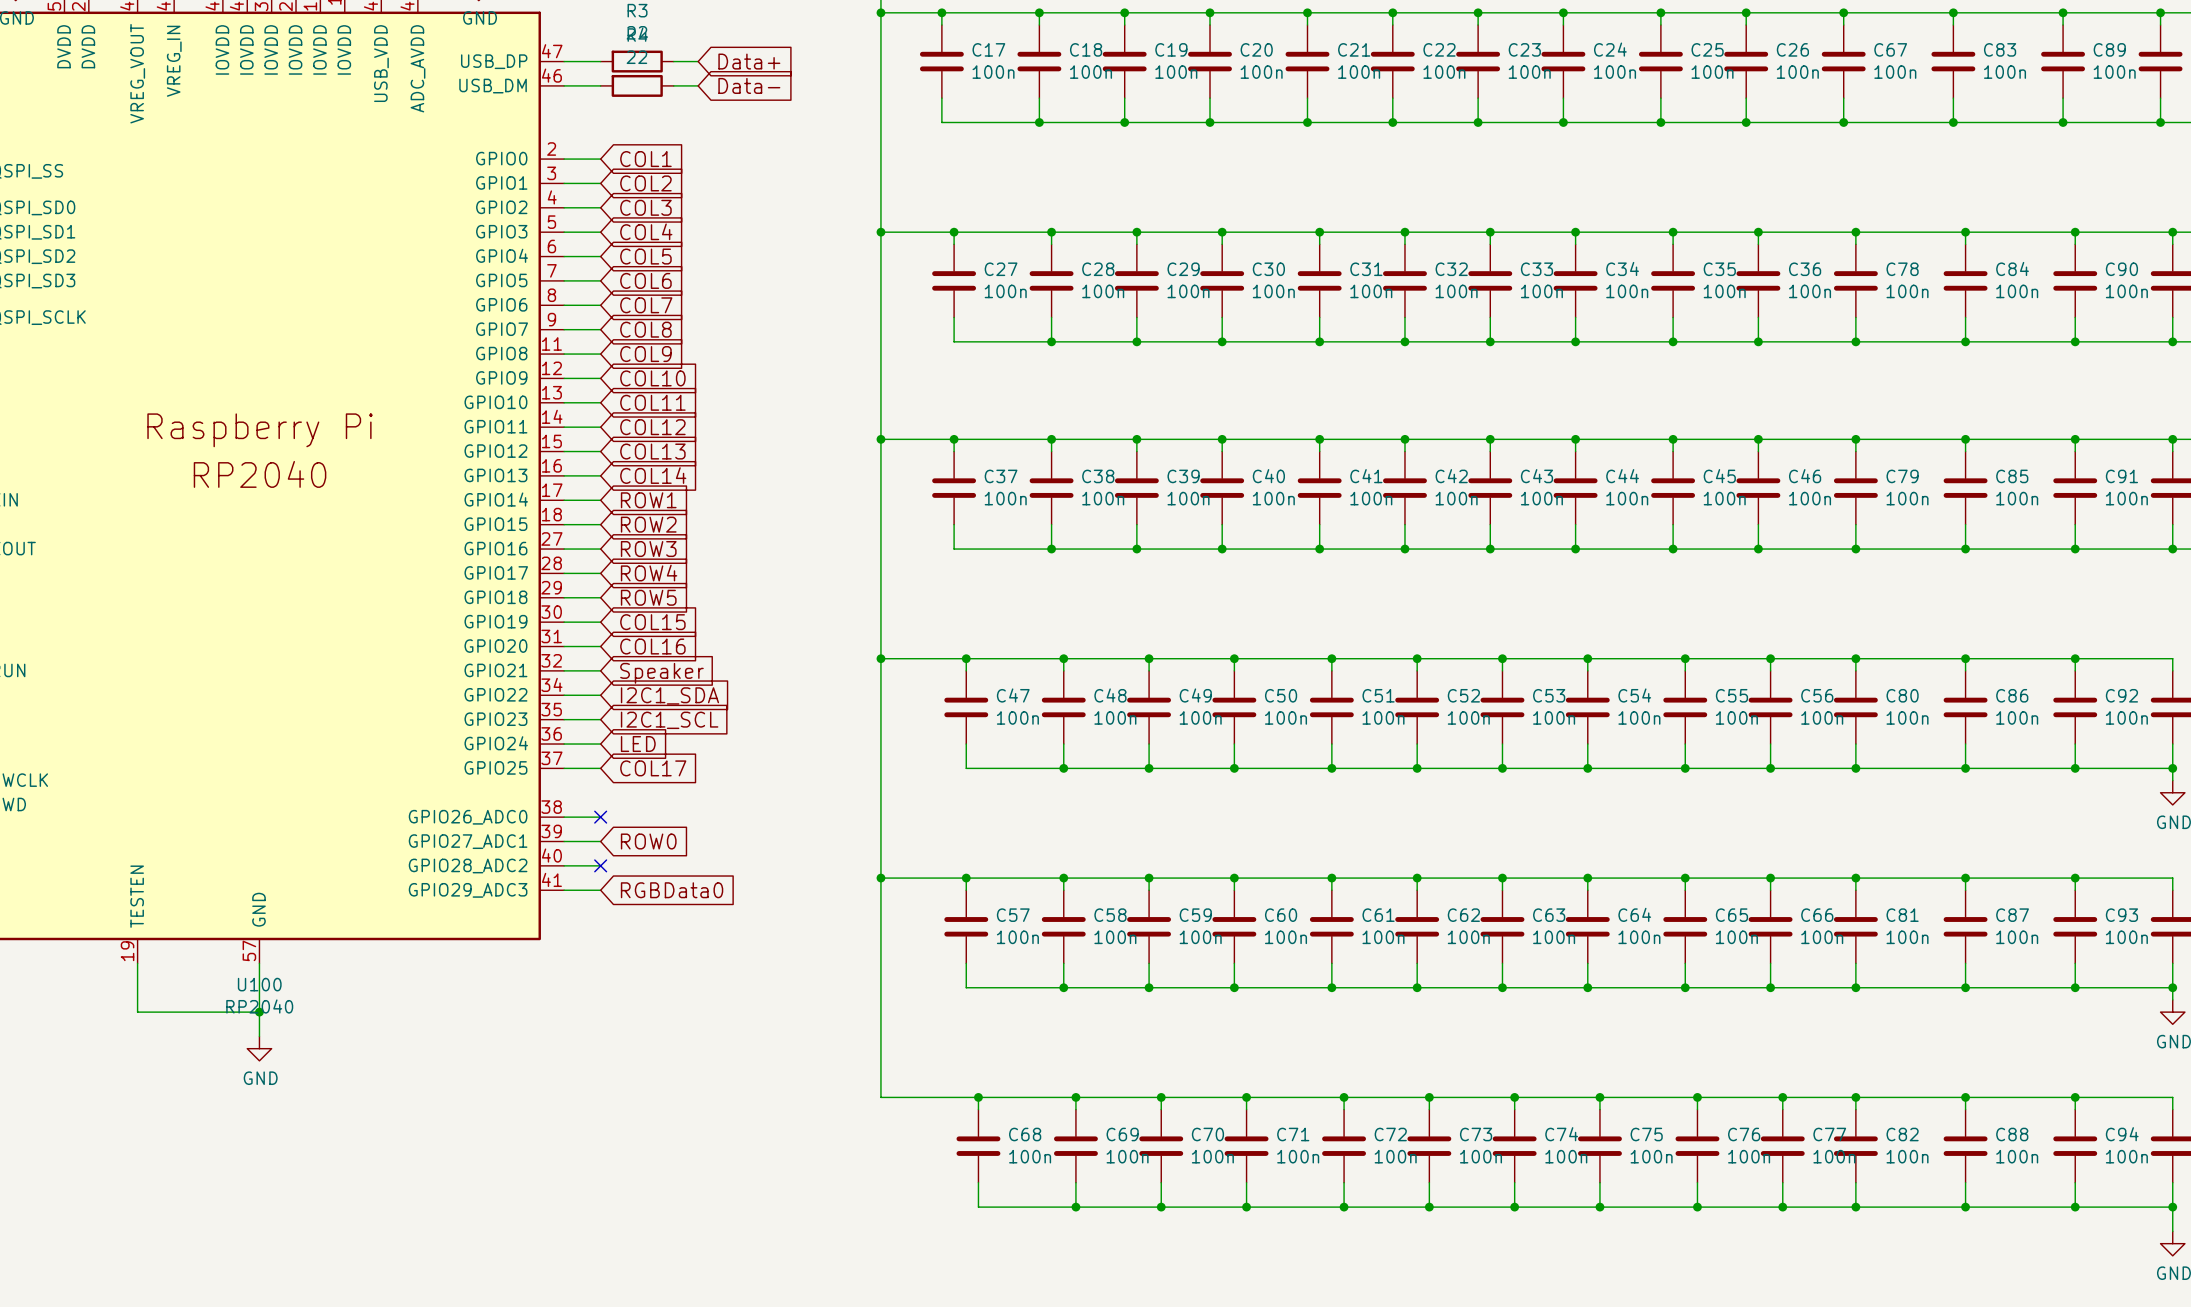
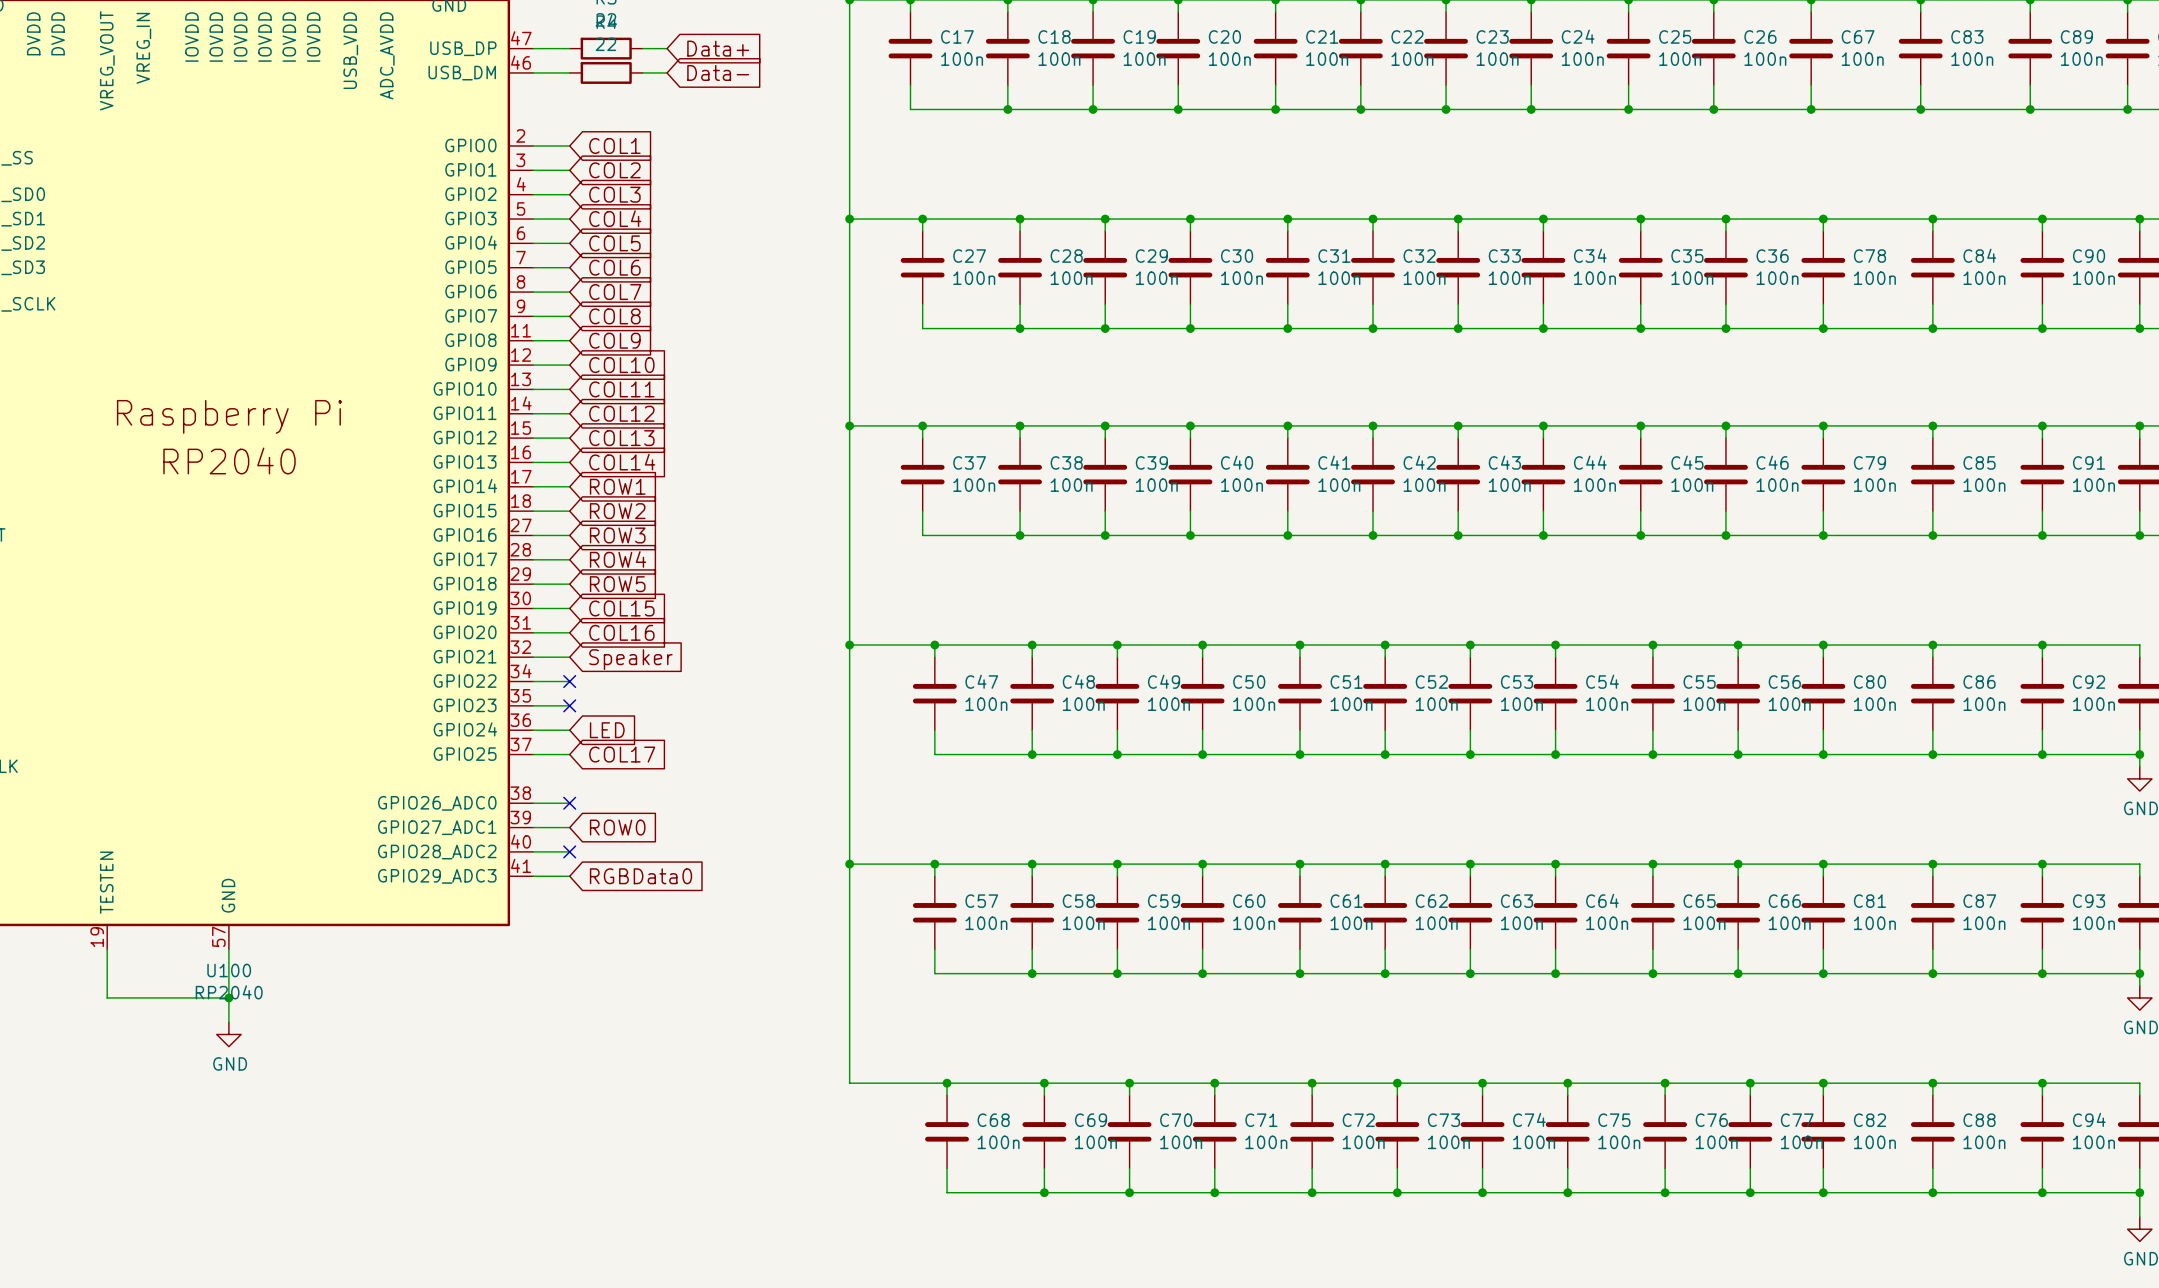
no-connect mark: none -> (569, 681)
global label: I2C1_SDA (669, 695) -> none
no-connect mark: none -> (569, 705)
global label: I2C1_SCL (669, 720) -> none

